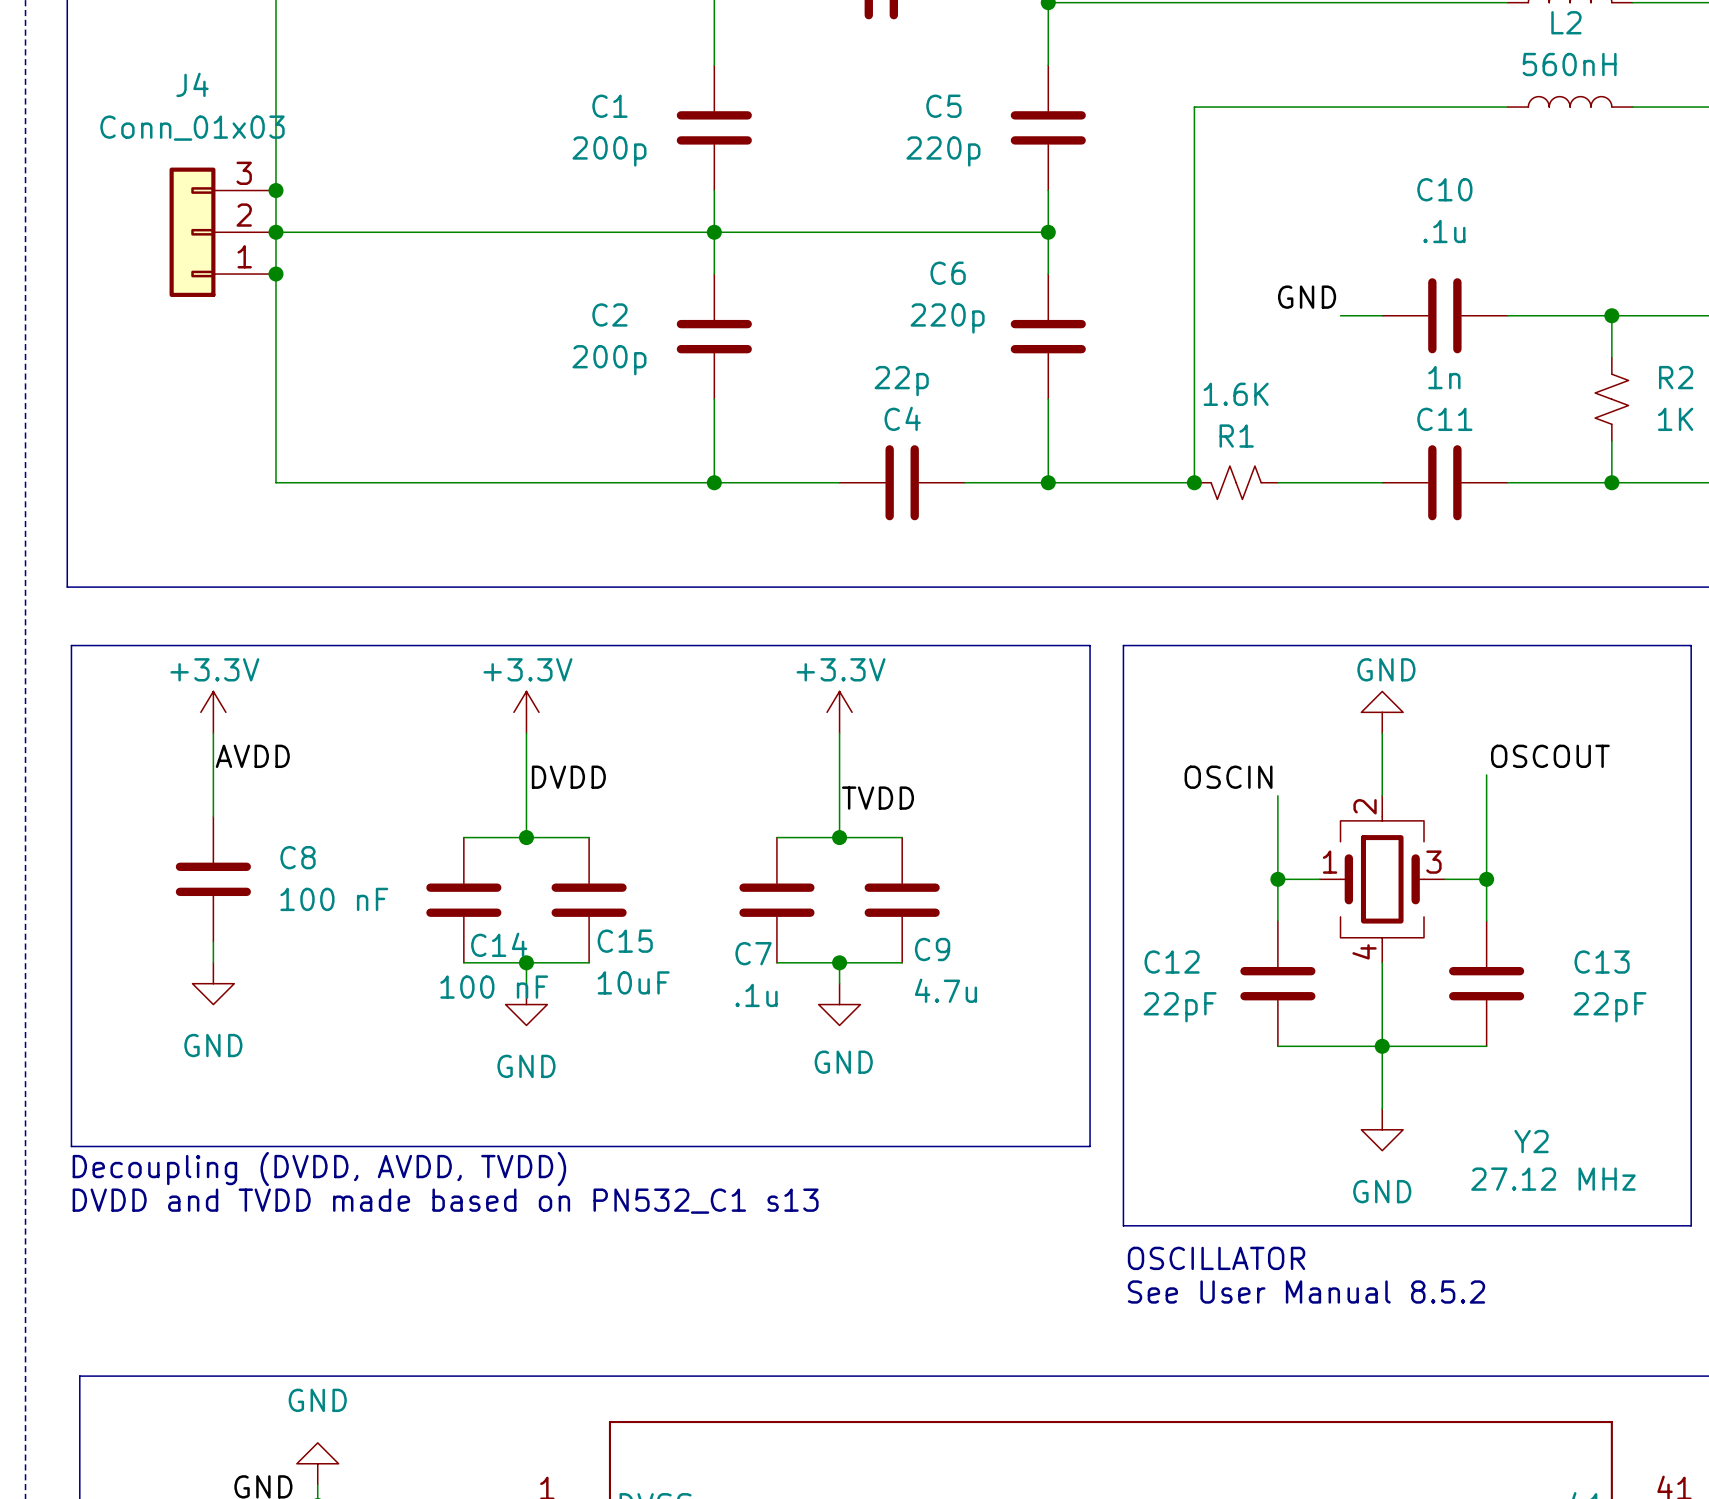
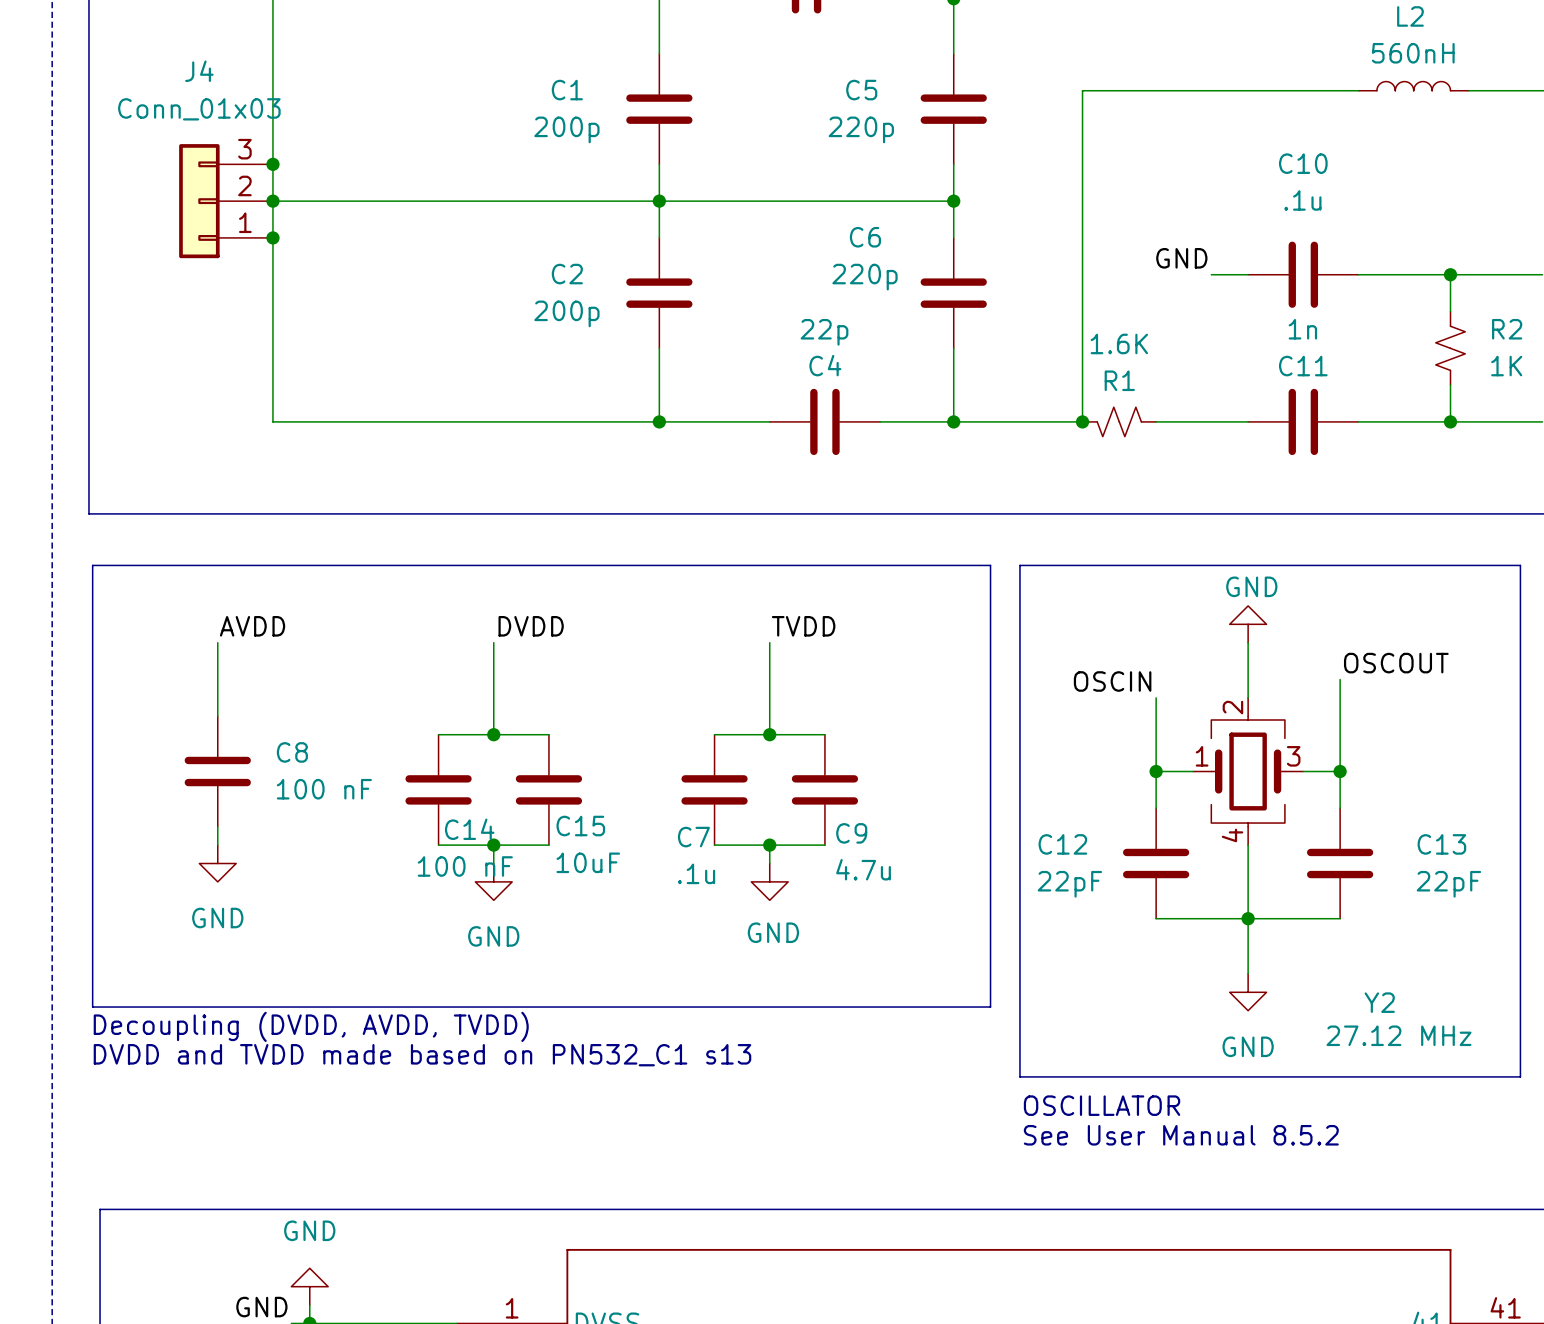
power symbol: +3.3V (213, 712) -> none
power symbol: +3.3V (526, 712) -> none
power symbol: +3.3V (839, 712) -> none
label position: AVDD (252, 756) -> AVDD (252, 626)
label position: DVDD (568, 777) -> DVDD (531, 626)
label position: TVDD (877, 798) -> TVDD (803, 626)

